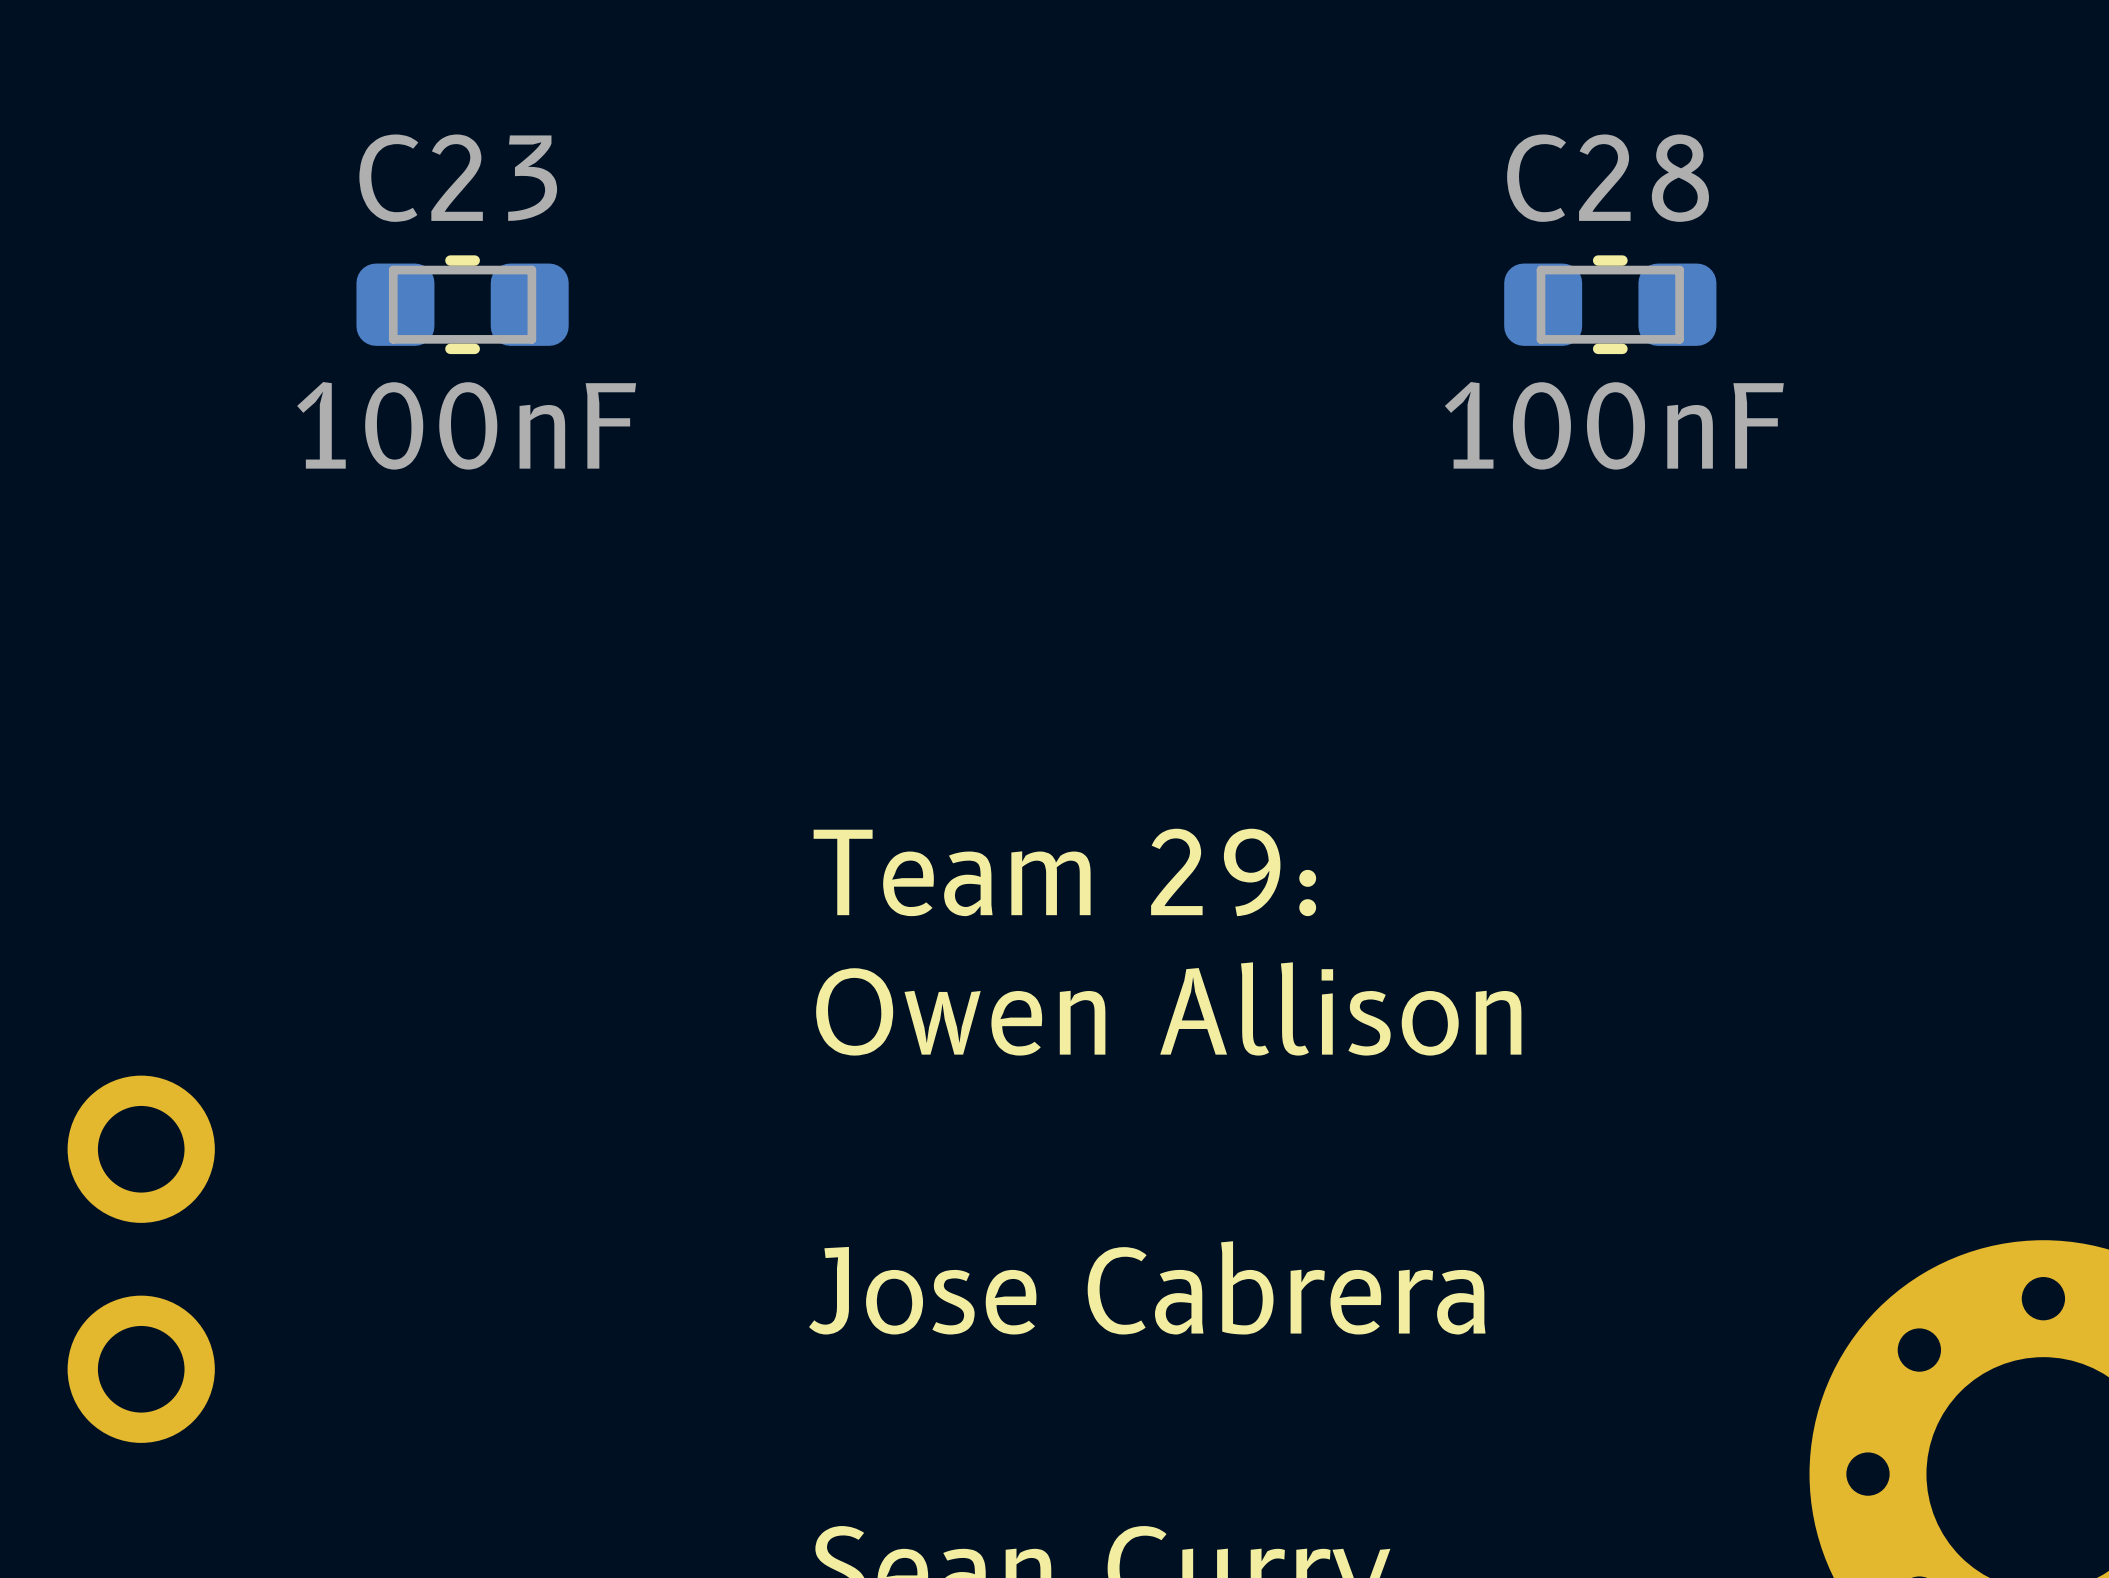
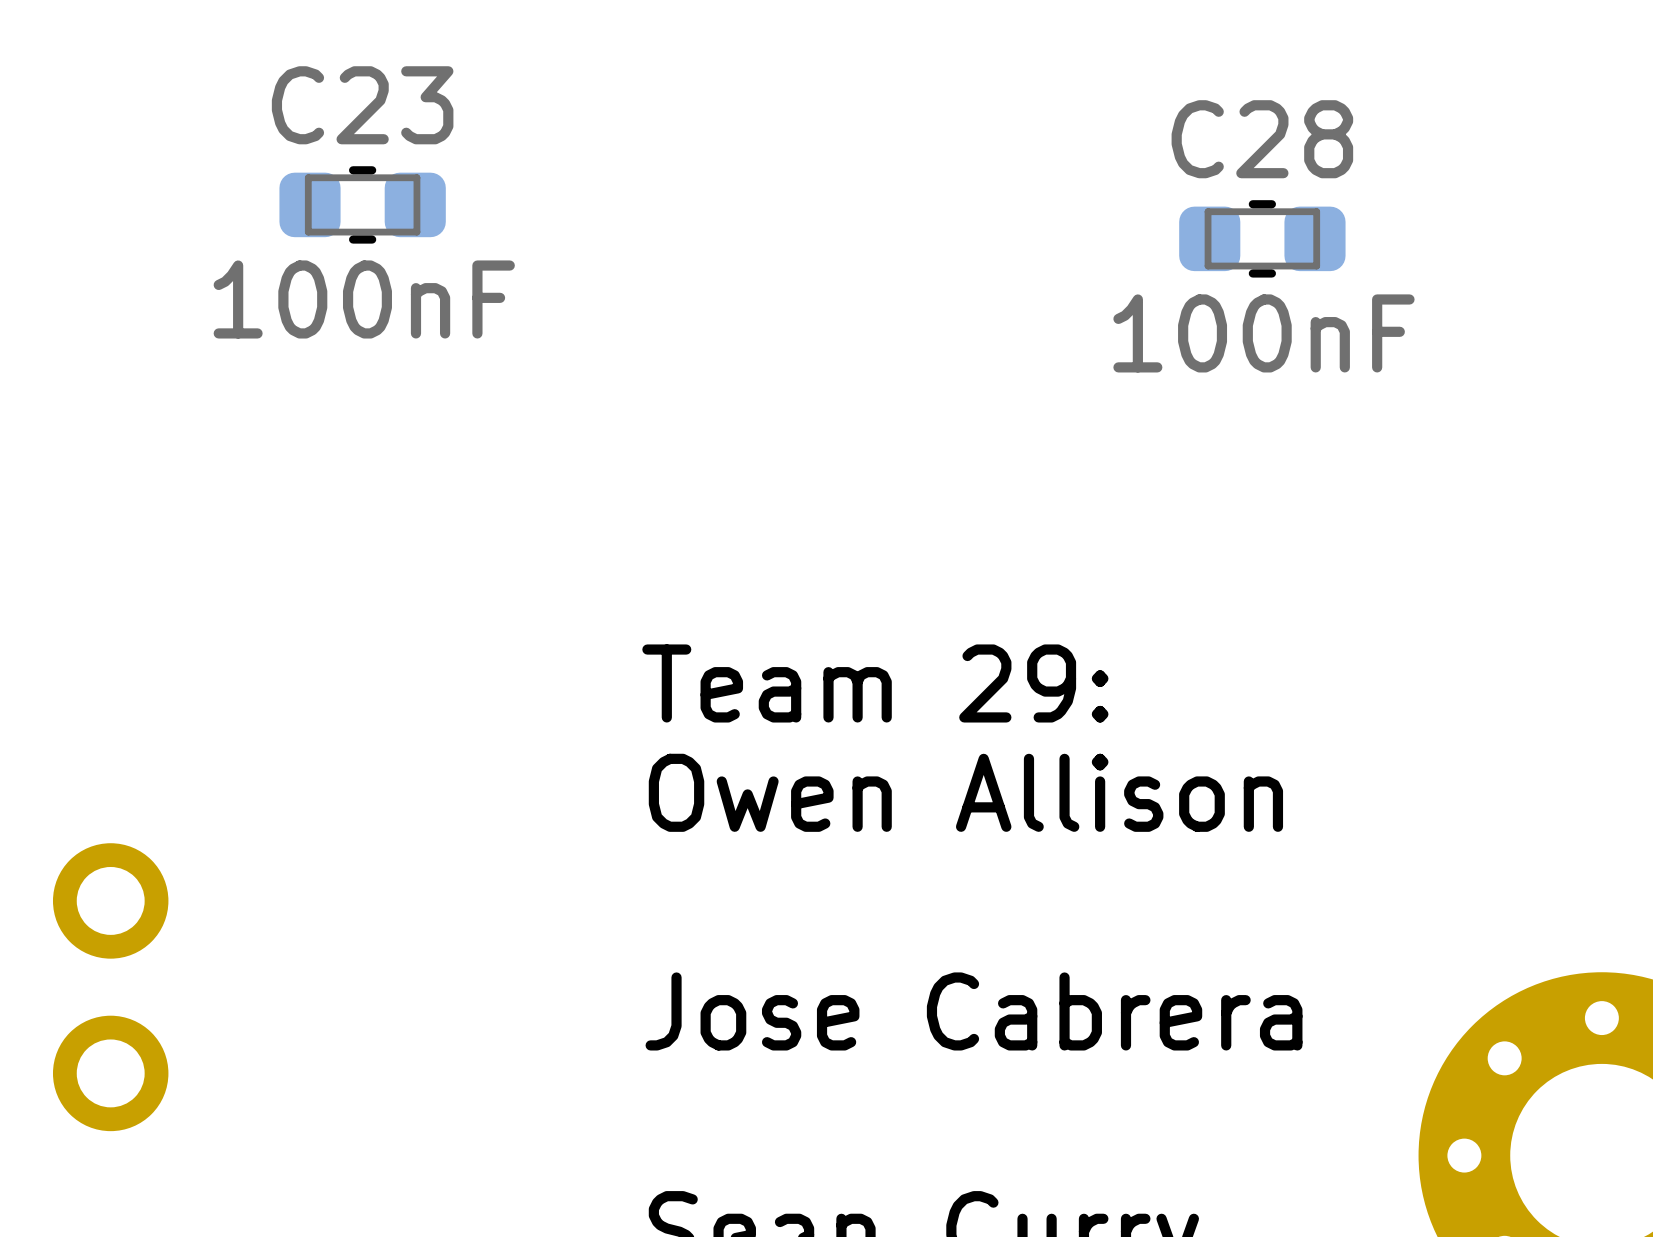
C23 position: (462, 304) -> (362, 204)

